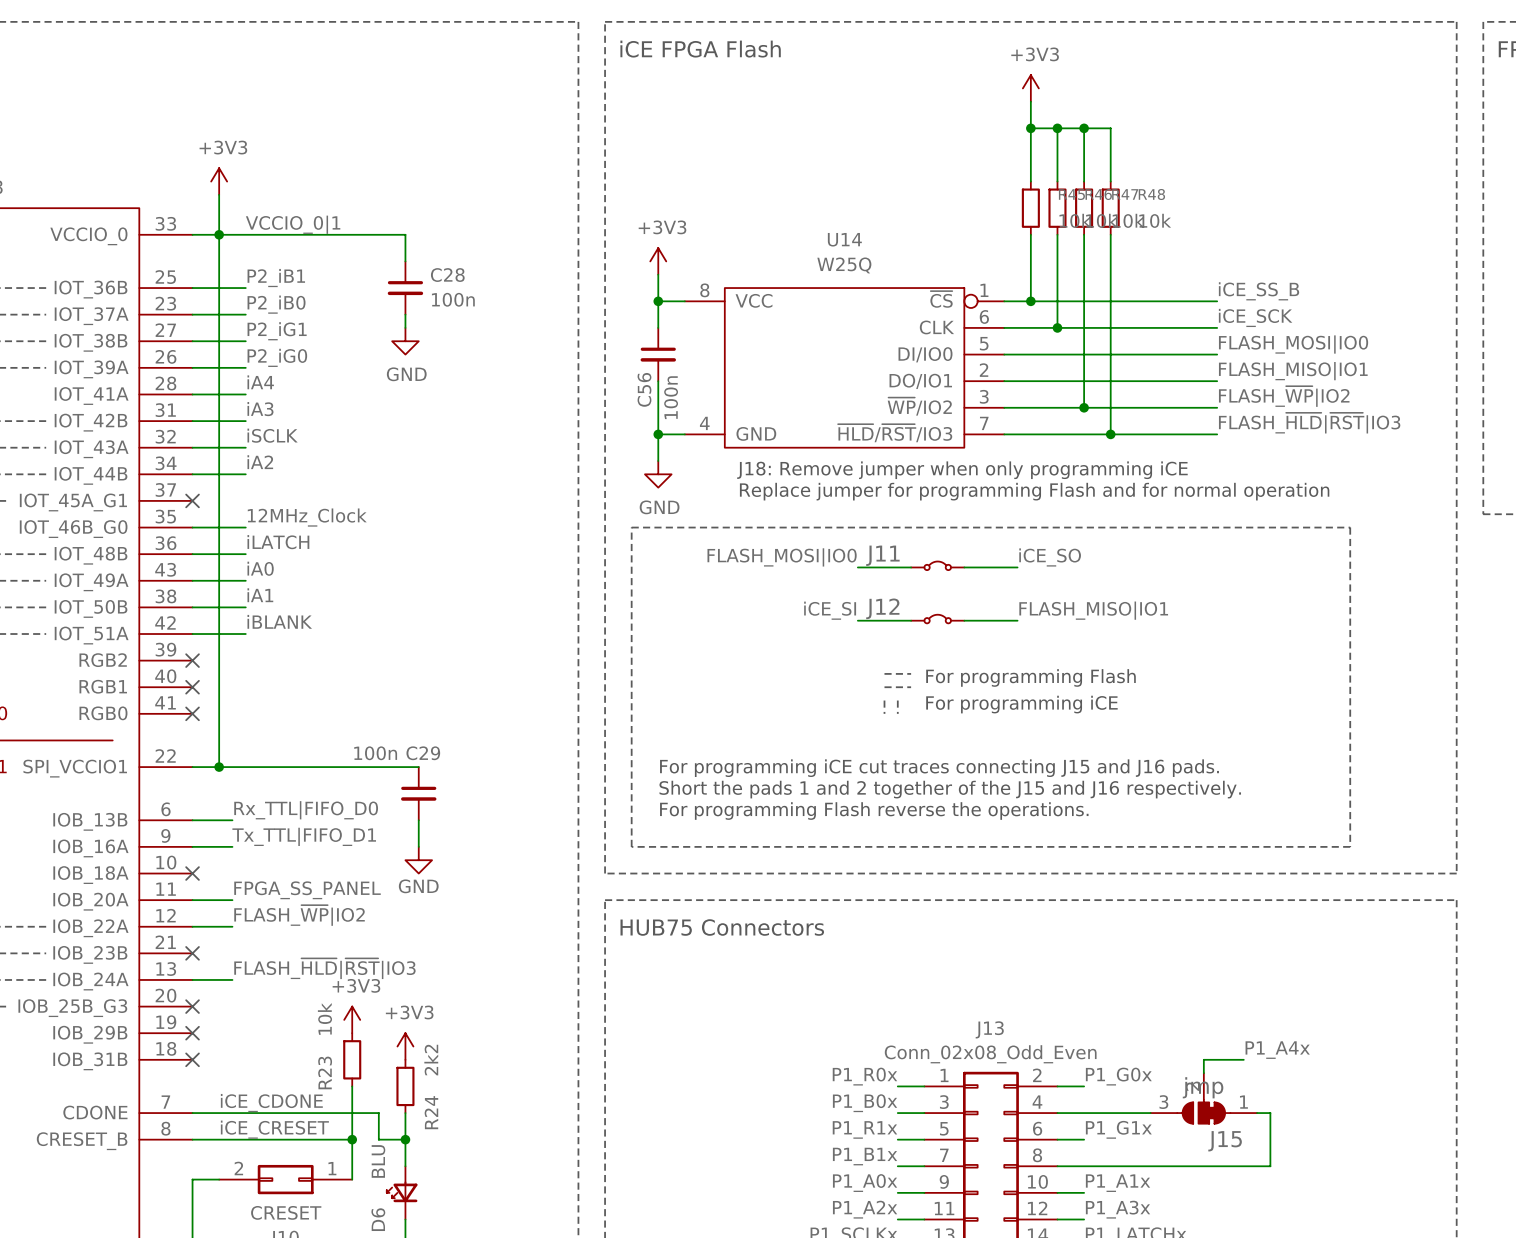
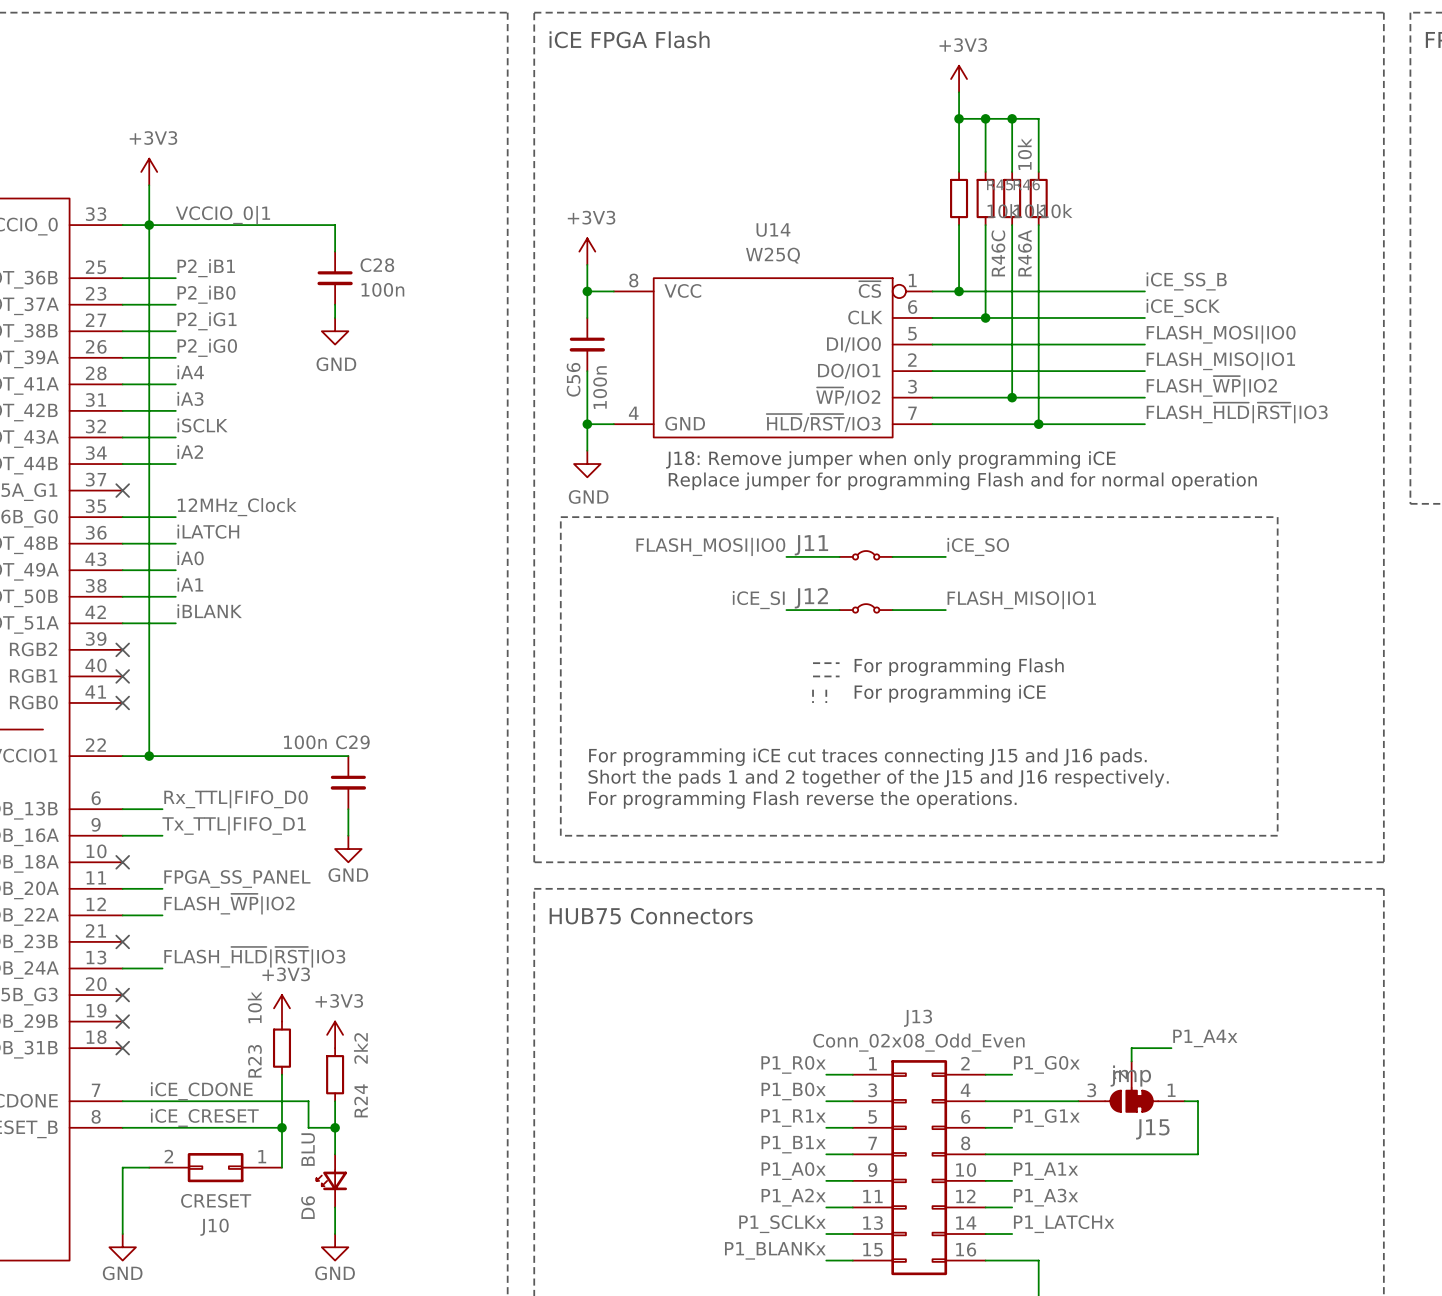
R47 name: R47 (1125, 194) -> R46C (998, 253)
R48 name: R48 (1151, 194) -> R46A (1024, 253)
R48 value rotation: 0° (1155, 220) -> 90° counterclockwise (1024, 154)
R48 value position: 10k (1155, 220) -> 10k (1024, 154)

